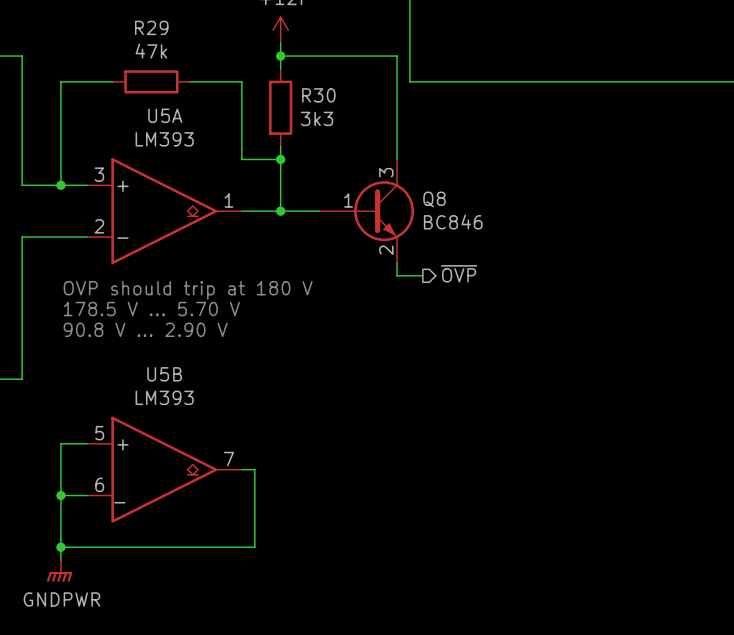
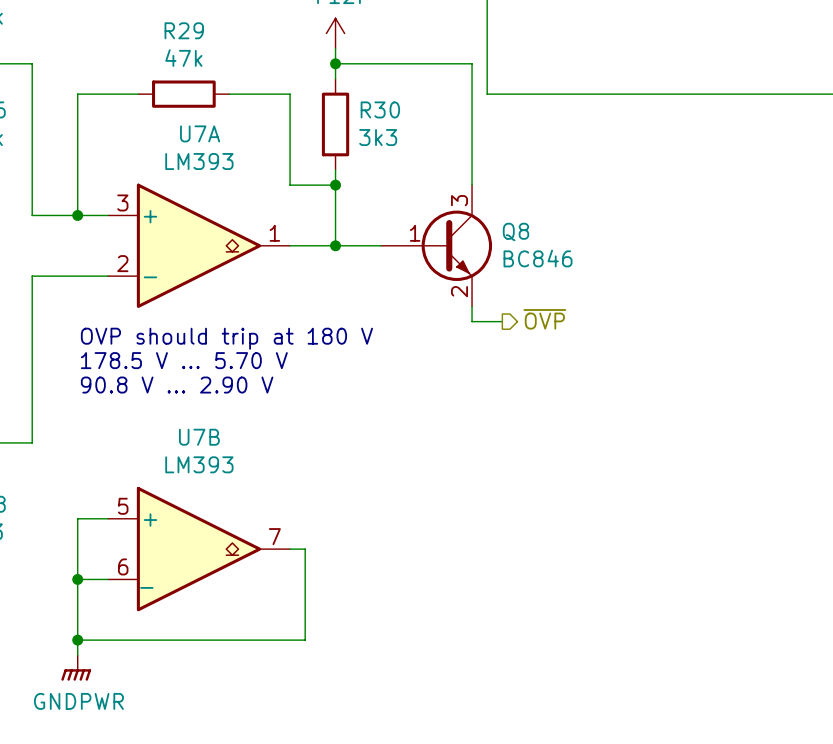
U5A name: U5A (165, 115) -> U7A (200, 133)
U5B name: U5B (164, 374) -> U7B (199, 437)

